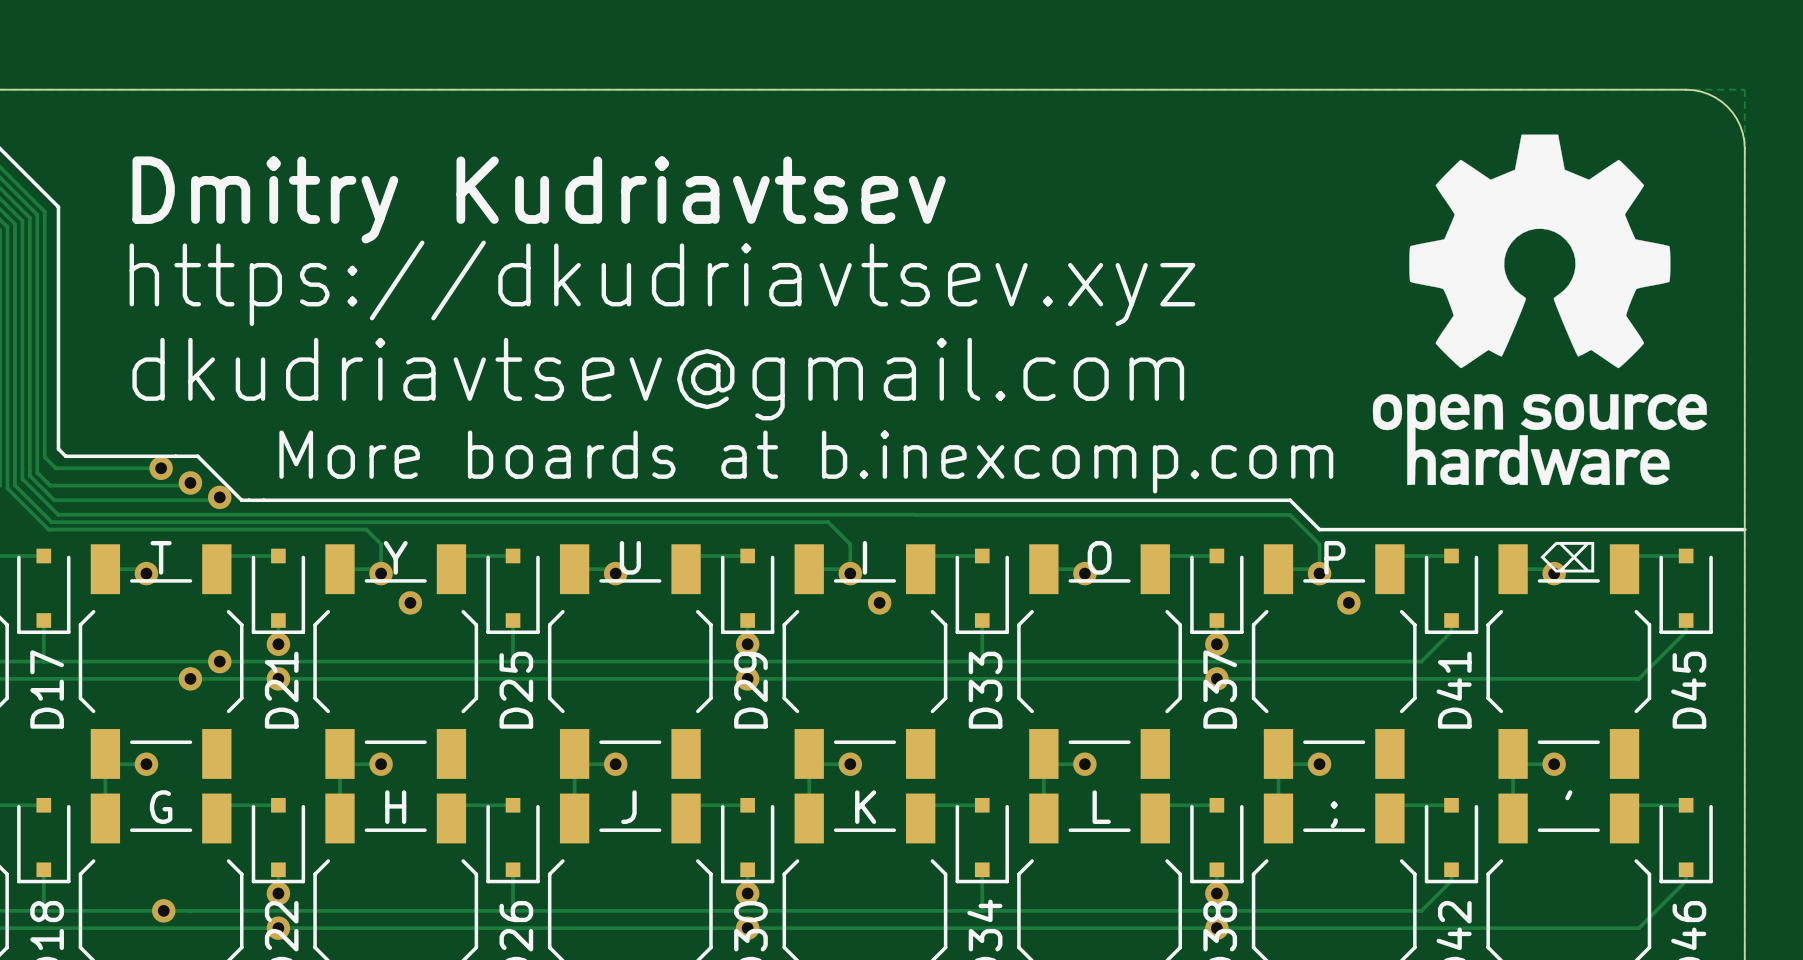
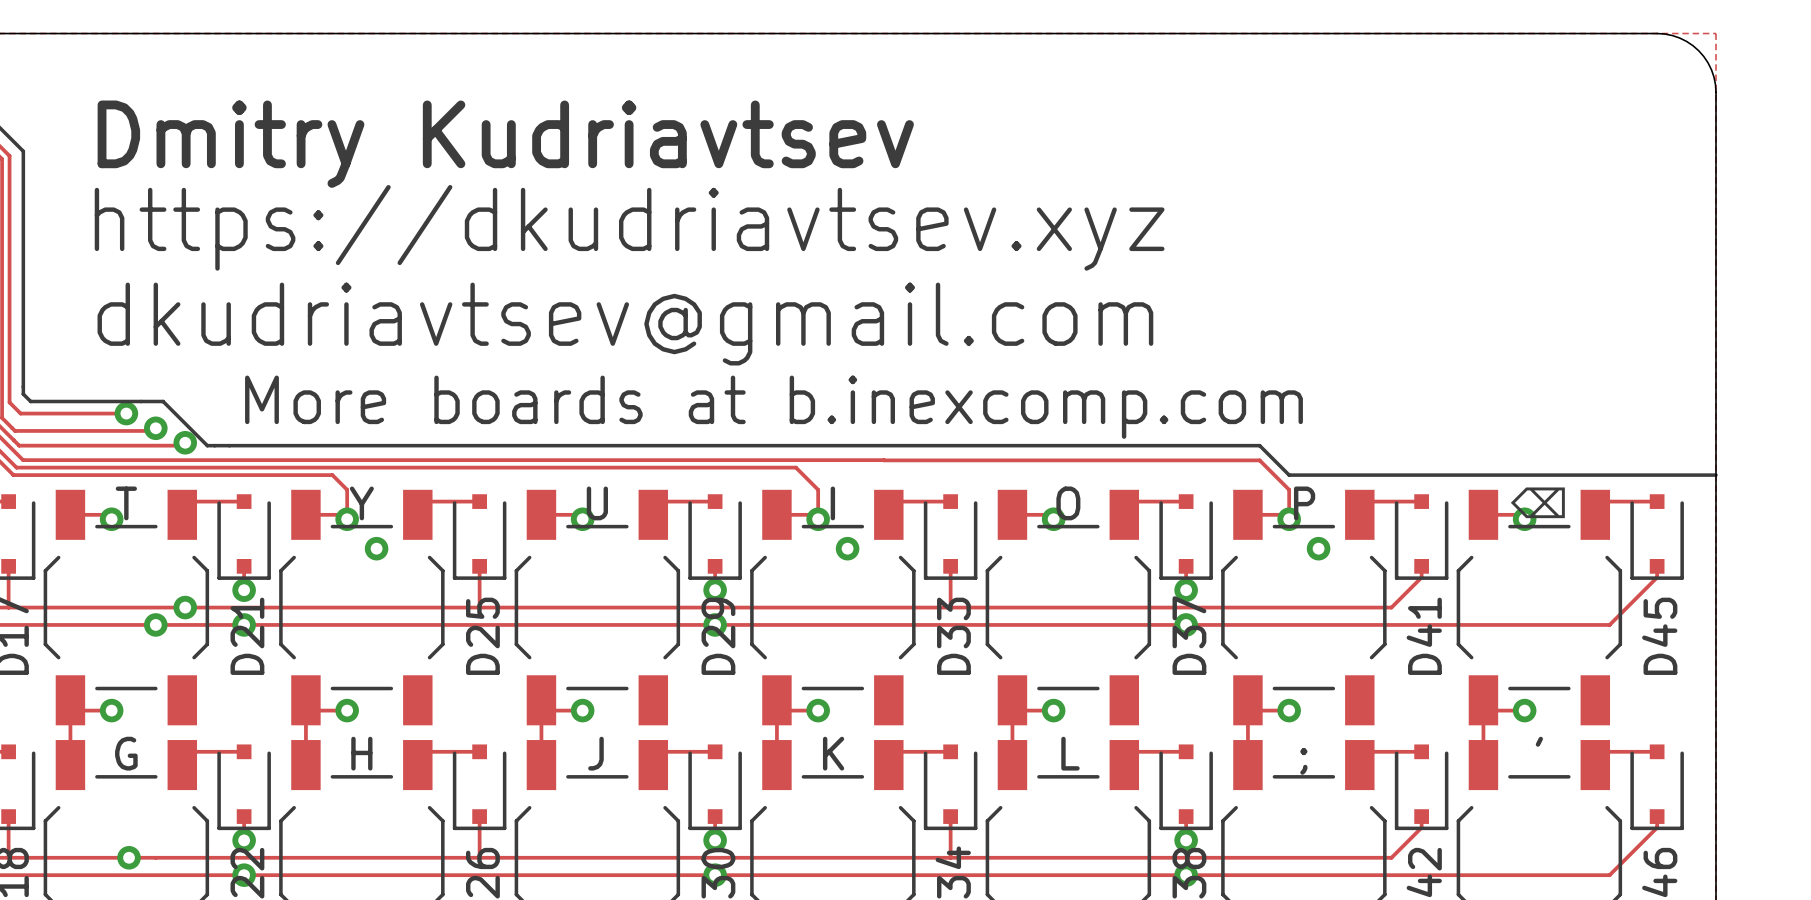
drawing: [1372, 134, 1707, 486] -> none

